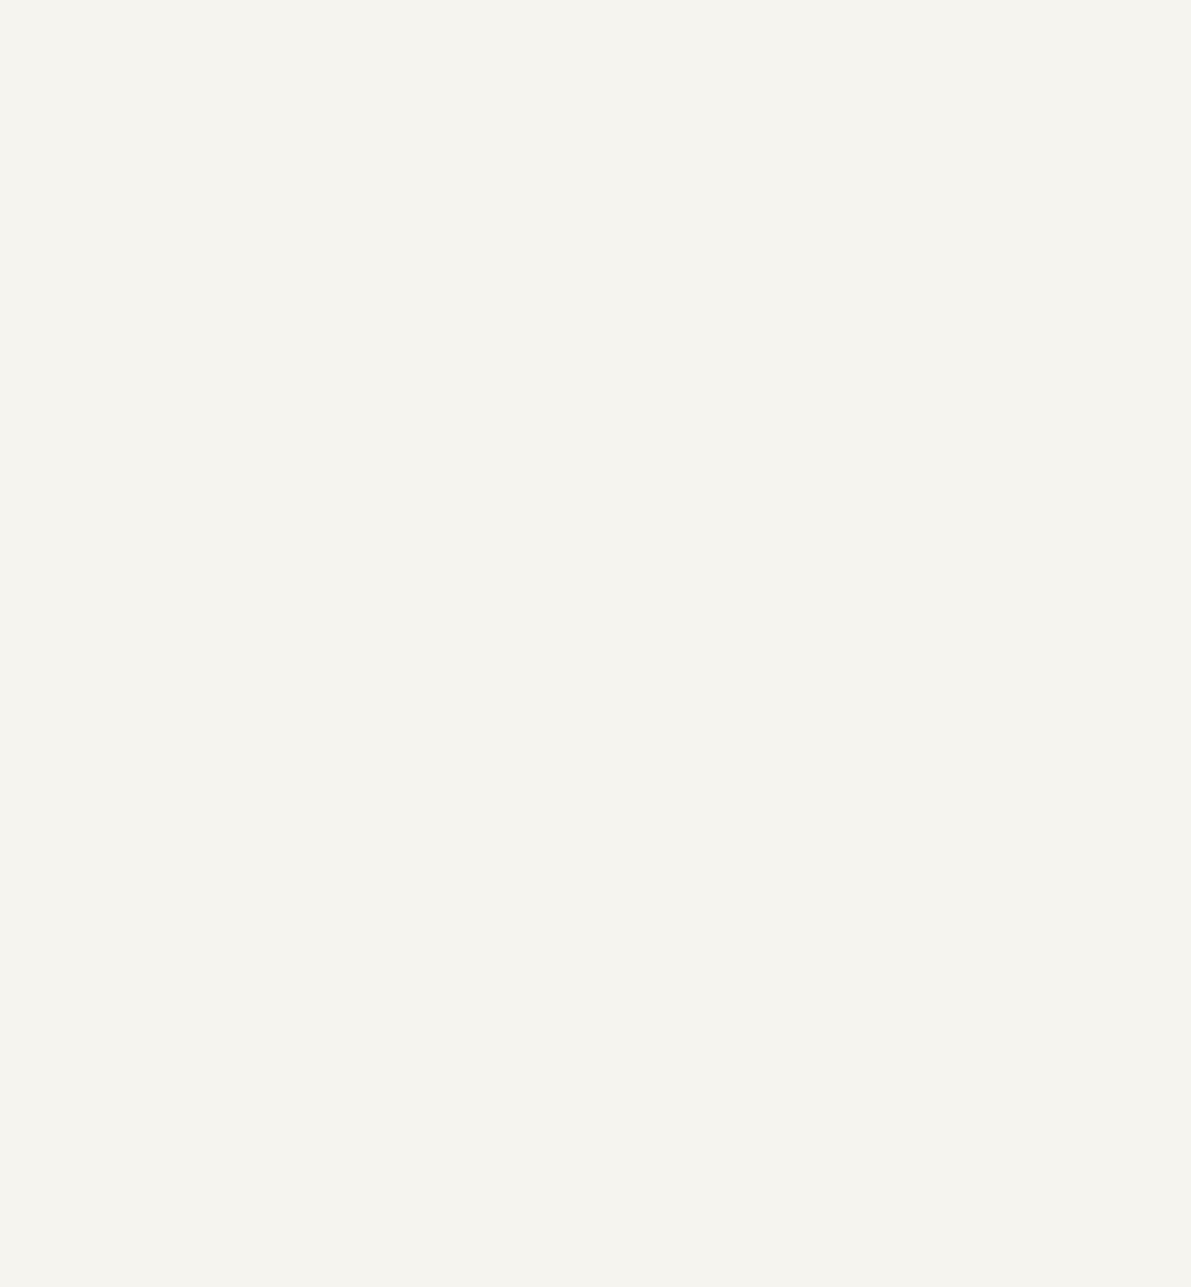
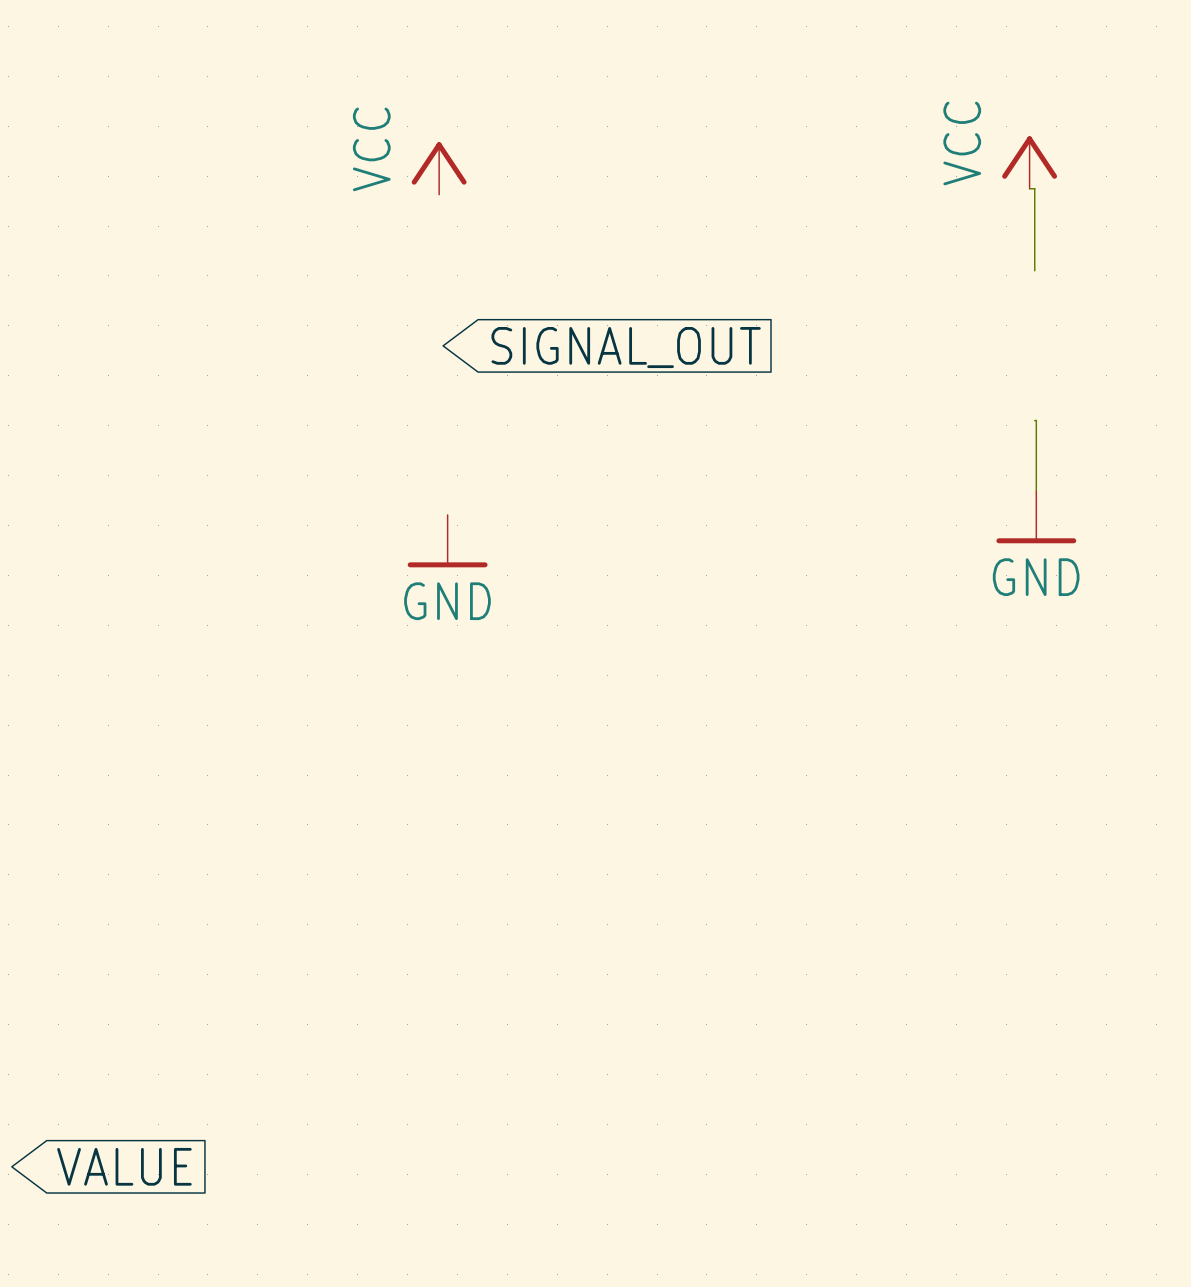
power symbol: none -> VCC (1029, 162)
power symbol: none -> VCC (439, 168)
wire: none -> (1029, 188) (1034, 188) (1034, 270)
global label: none -> SIGNAL_OUT (626, 347)
wire: none -> (1034, 420) (1036, 420) (1036, 490)
power symbol: none -> GND (1036, 517)
power symbol: none -> GND (447, 541)
global label: none -> VALUE (124, 1166)

